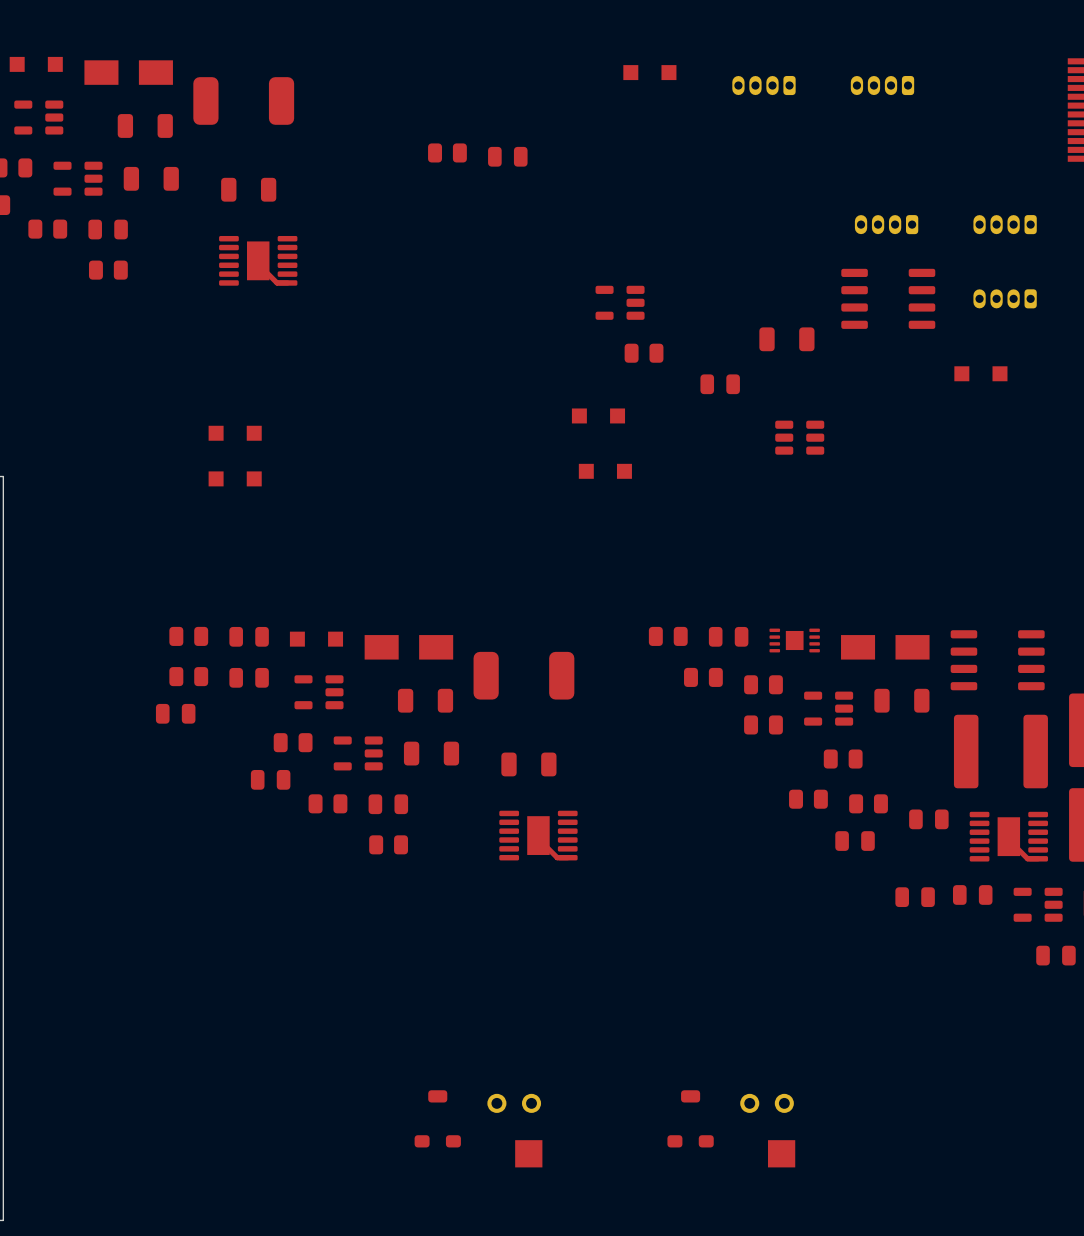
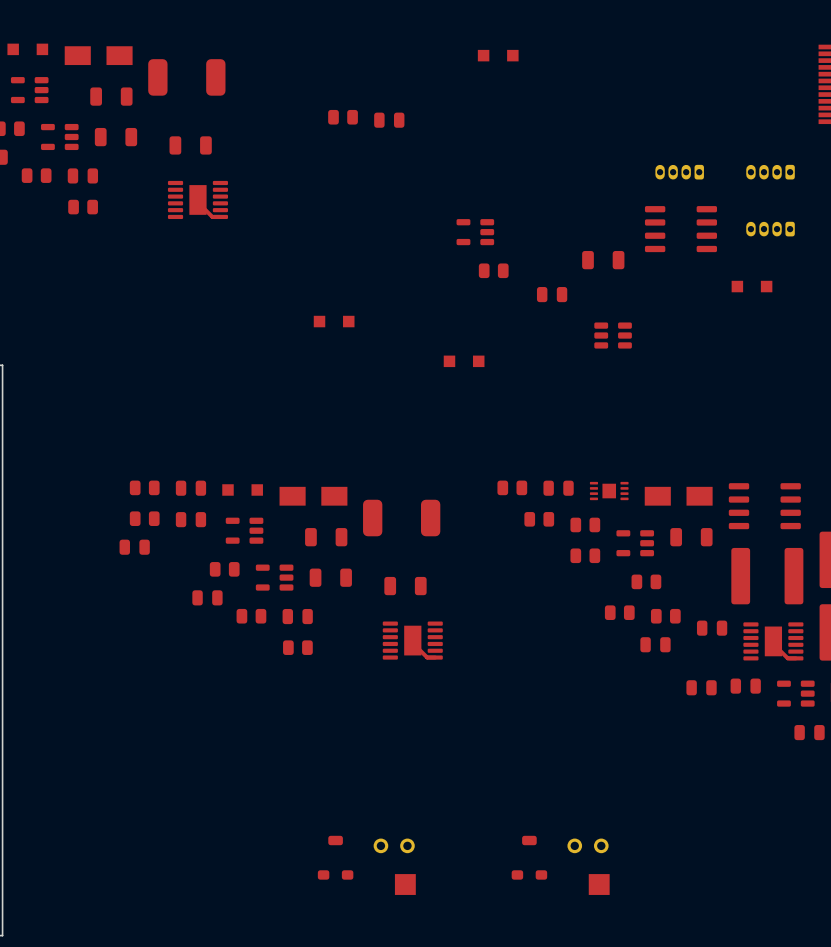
part: (763, 85) -> none
part: (882, 85) -> none
part: (598, 415) -> none
part: none -> (334, 321)
part: (235, 433) -> none
part: (235, 478) -> none

